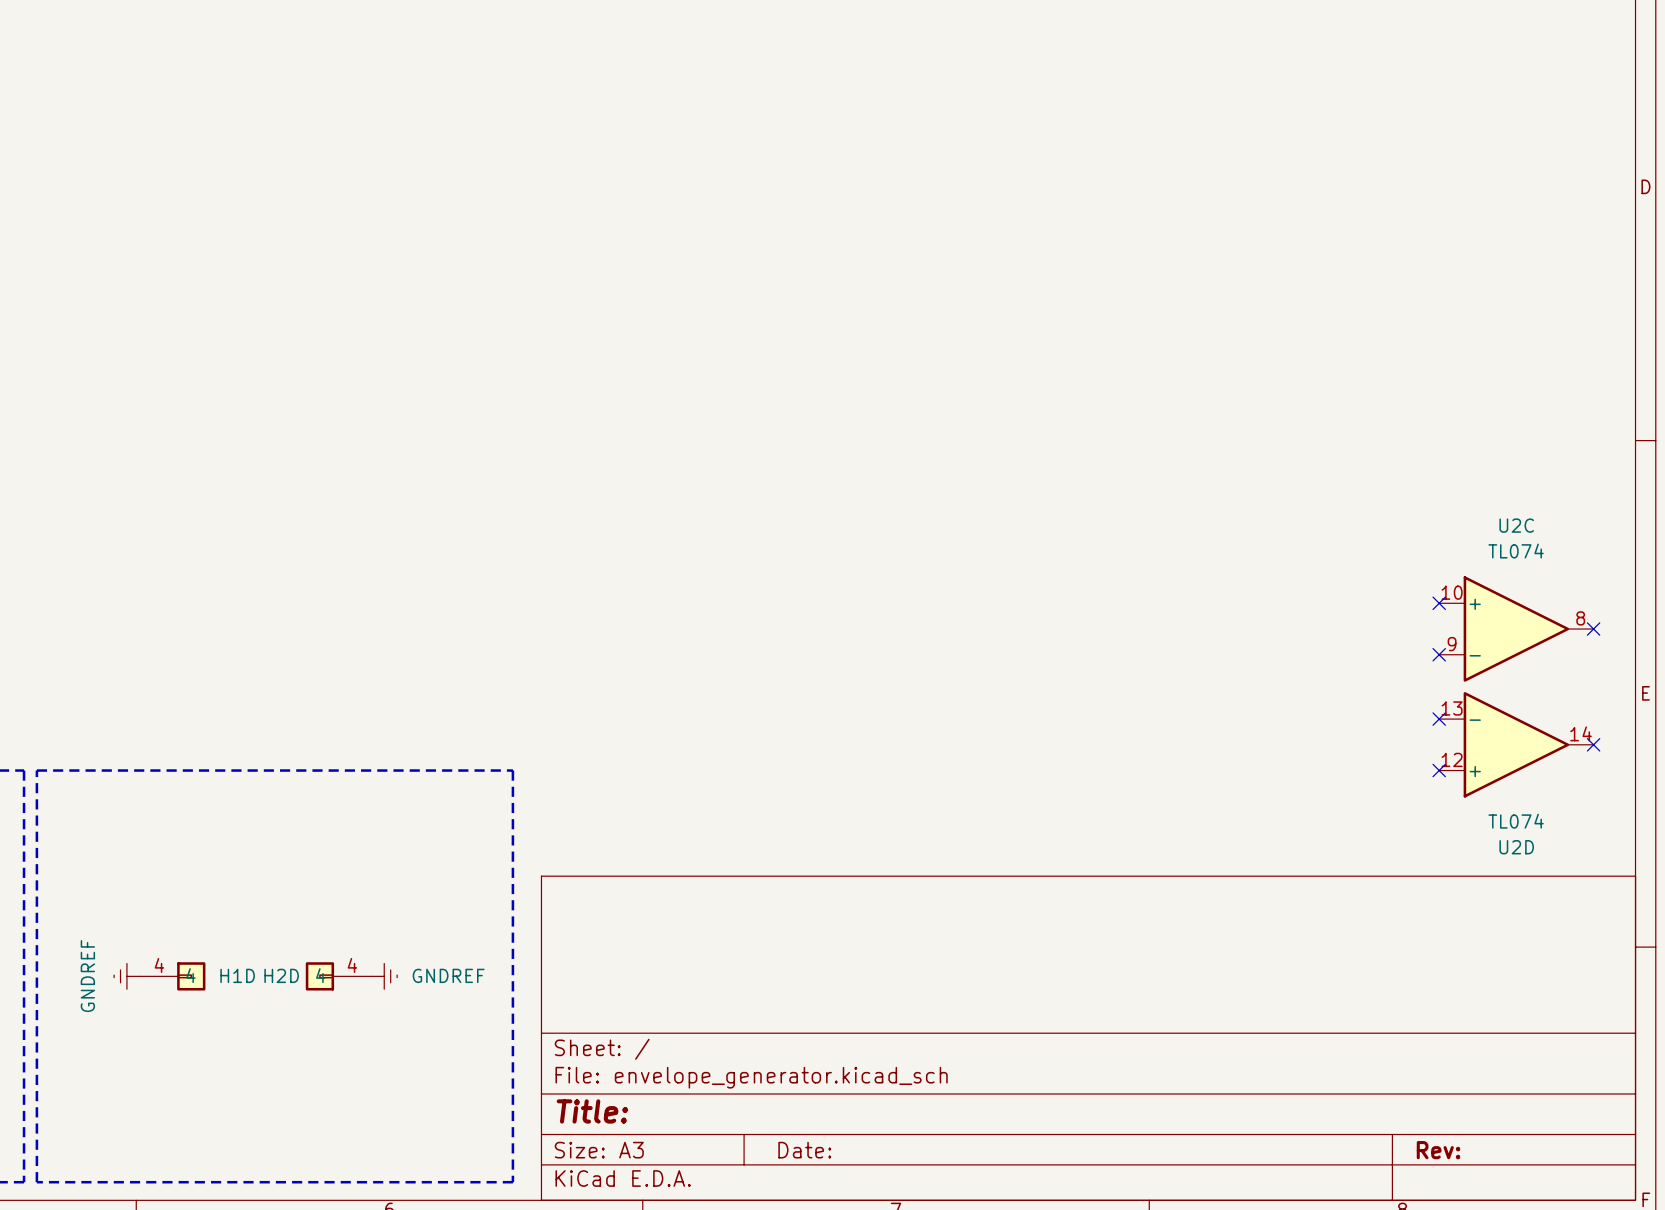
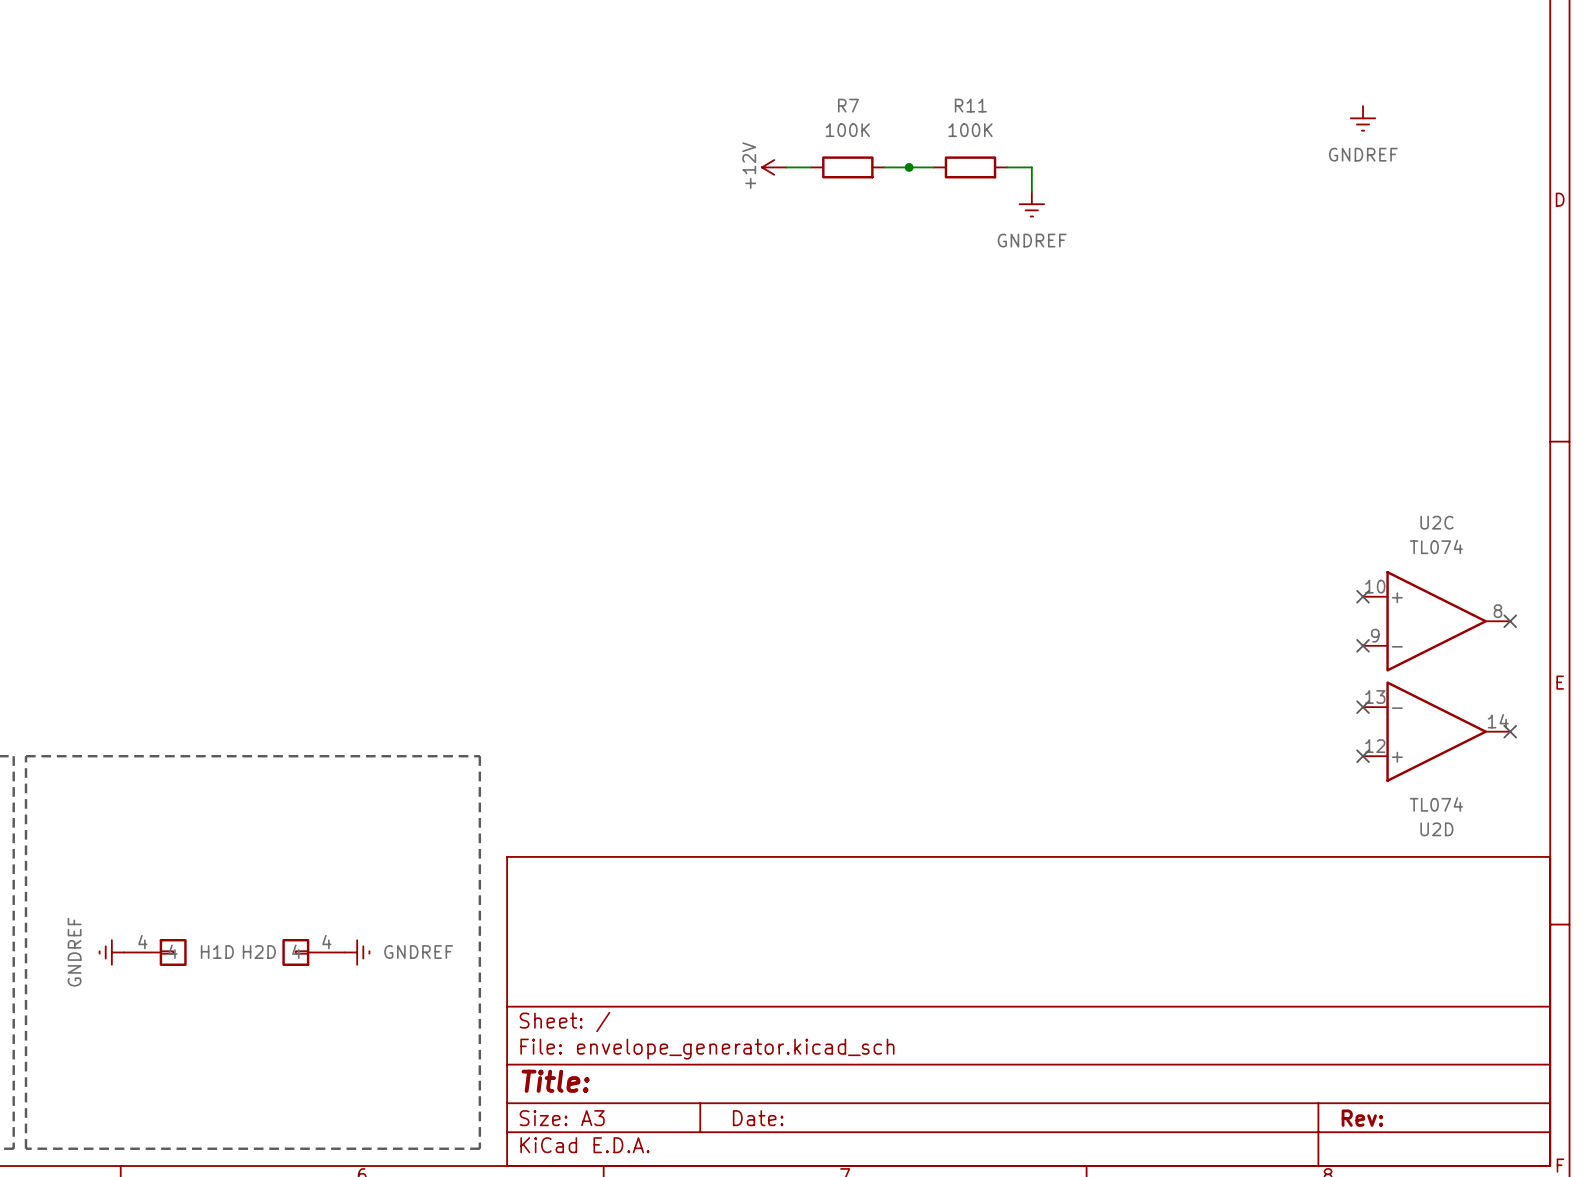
power symbol: none -> GNDREF (1363, 118)
power symbol: none -> +12V (774, 167)
wire: none -> (786, 167) (811, 167)
R7: none -> 100K (847, 167)
wire: none -> (884, 167) (933, 167)
junction: none -> (909, 167)
R11: none -> 100K (970, 167)
wire: none -> (1007, 167) (1031, 167) (1031, 191)
power symbol: none -> GNDREF (1031, 204)

